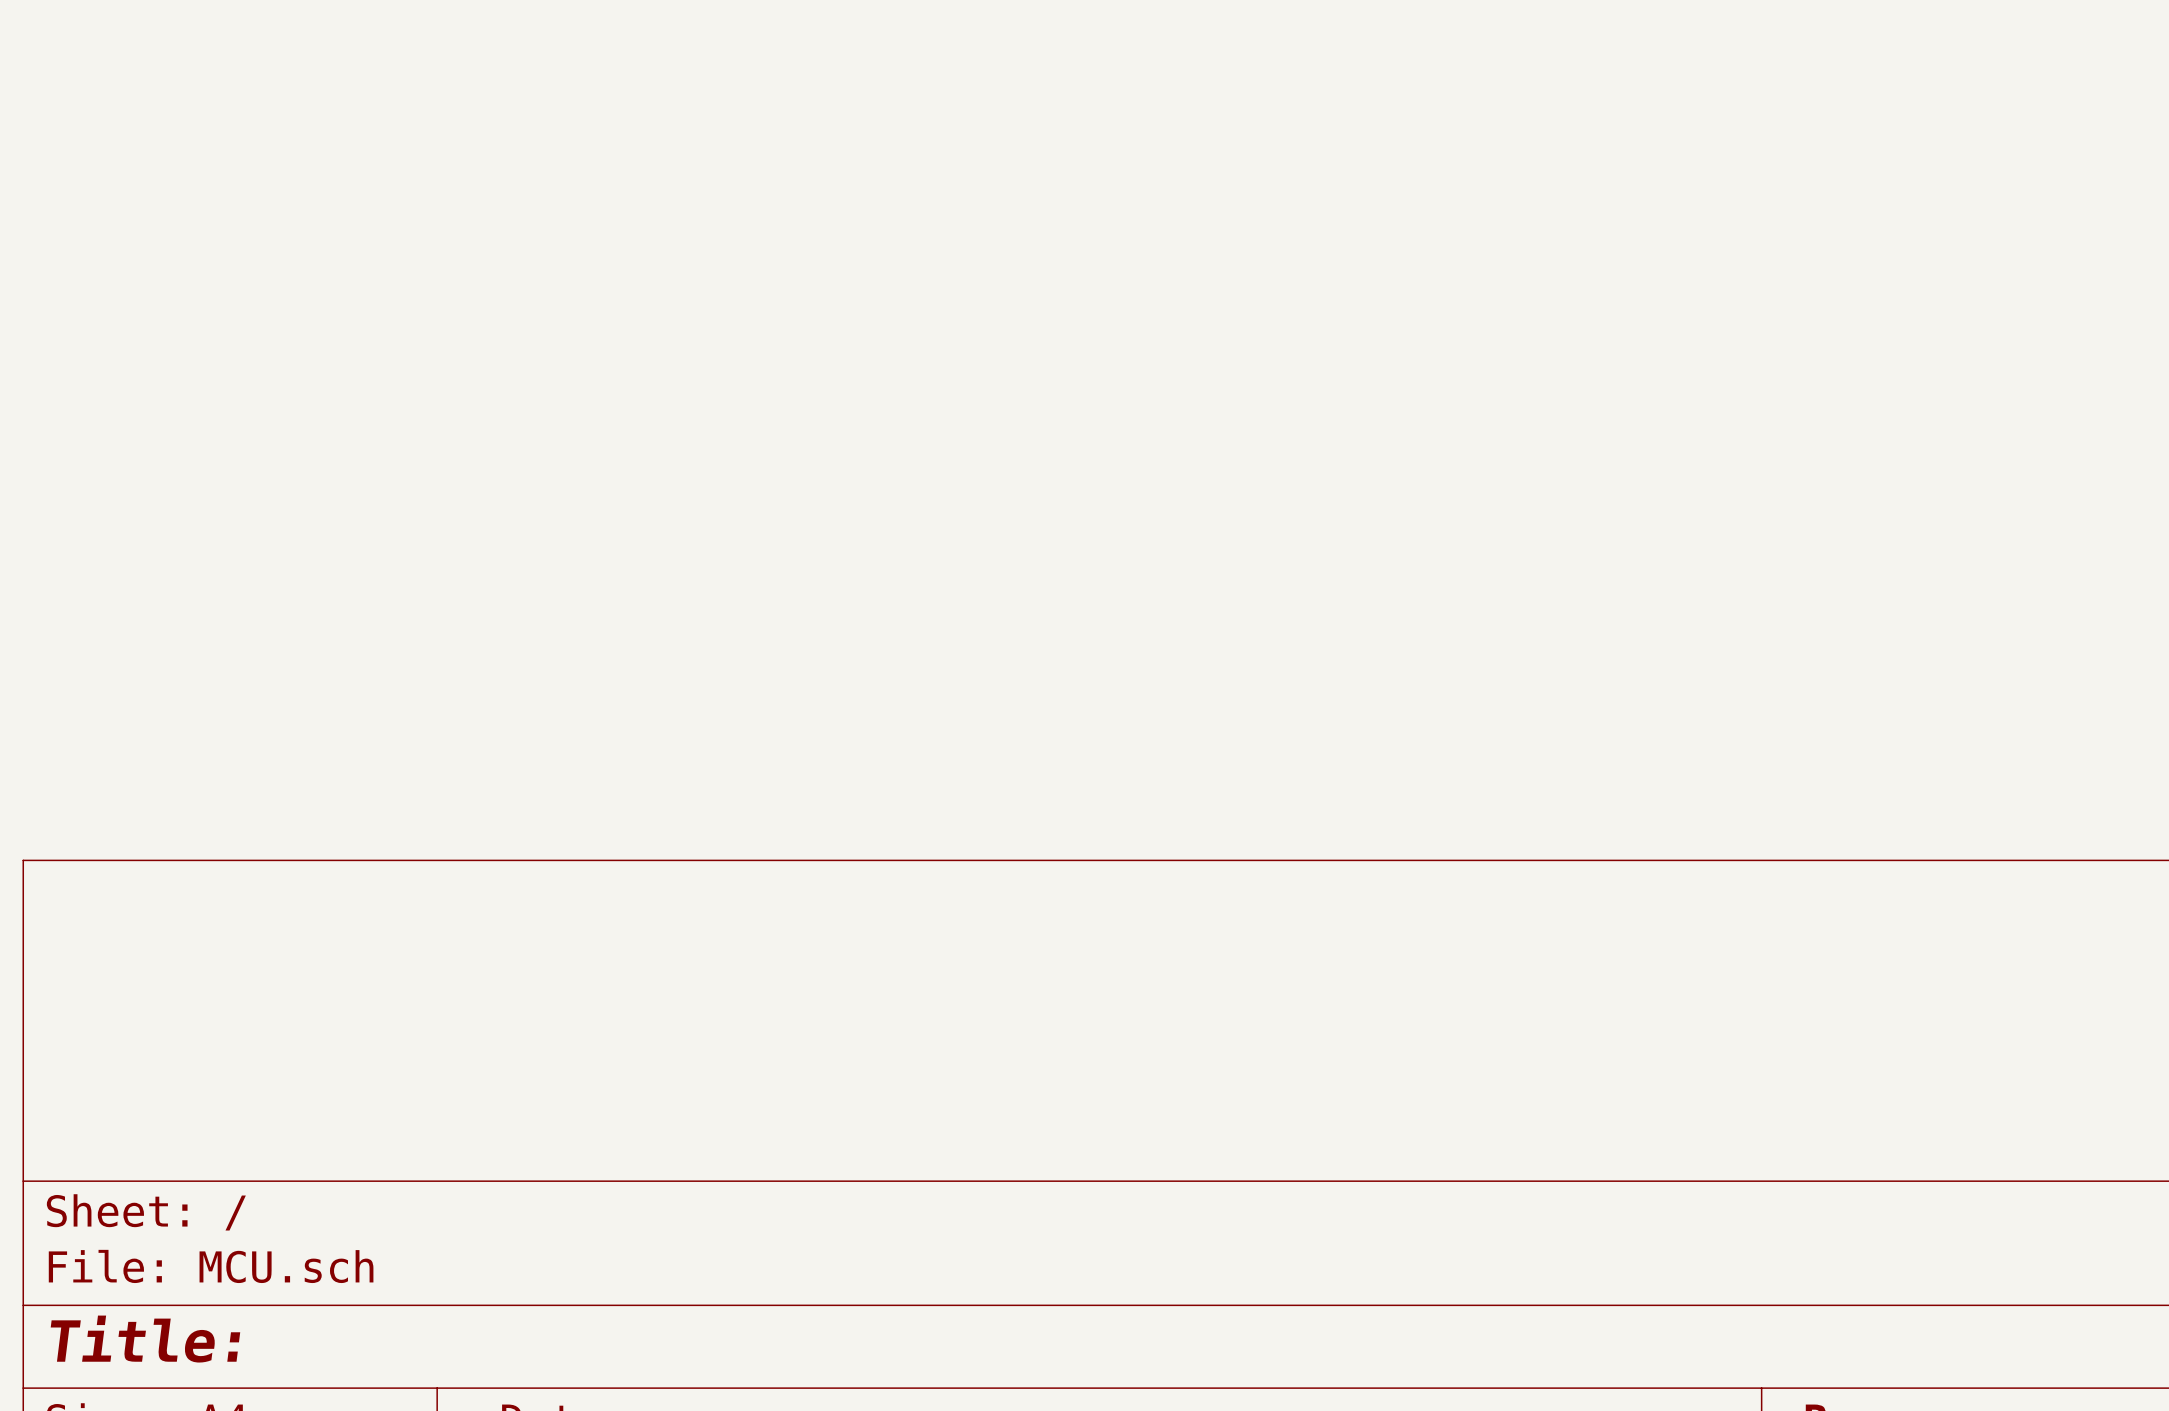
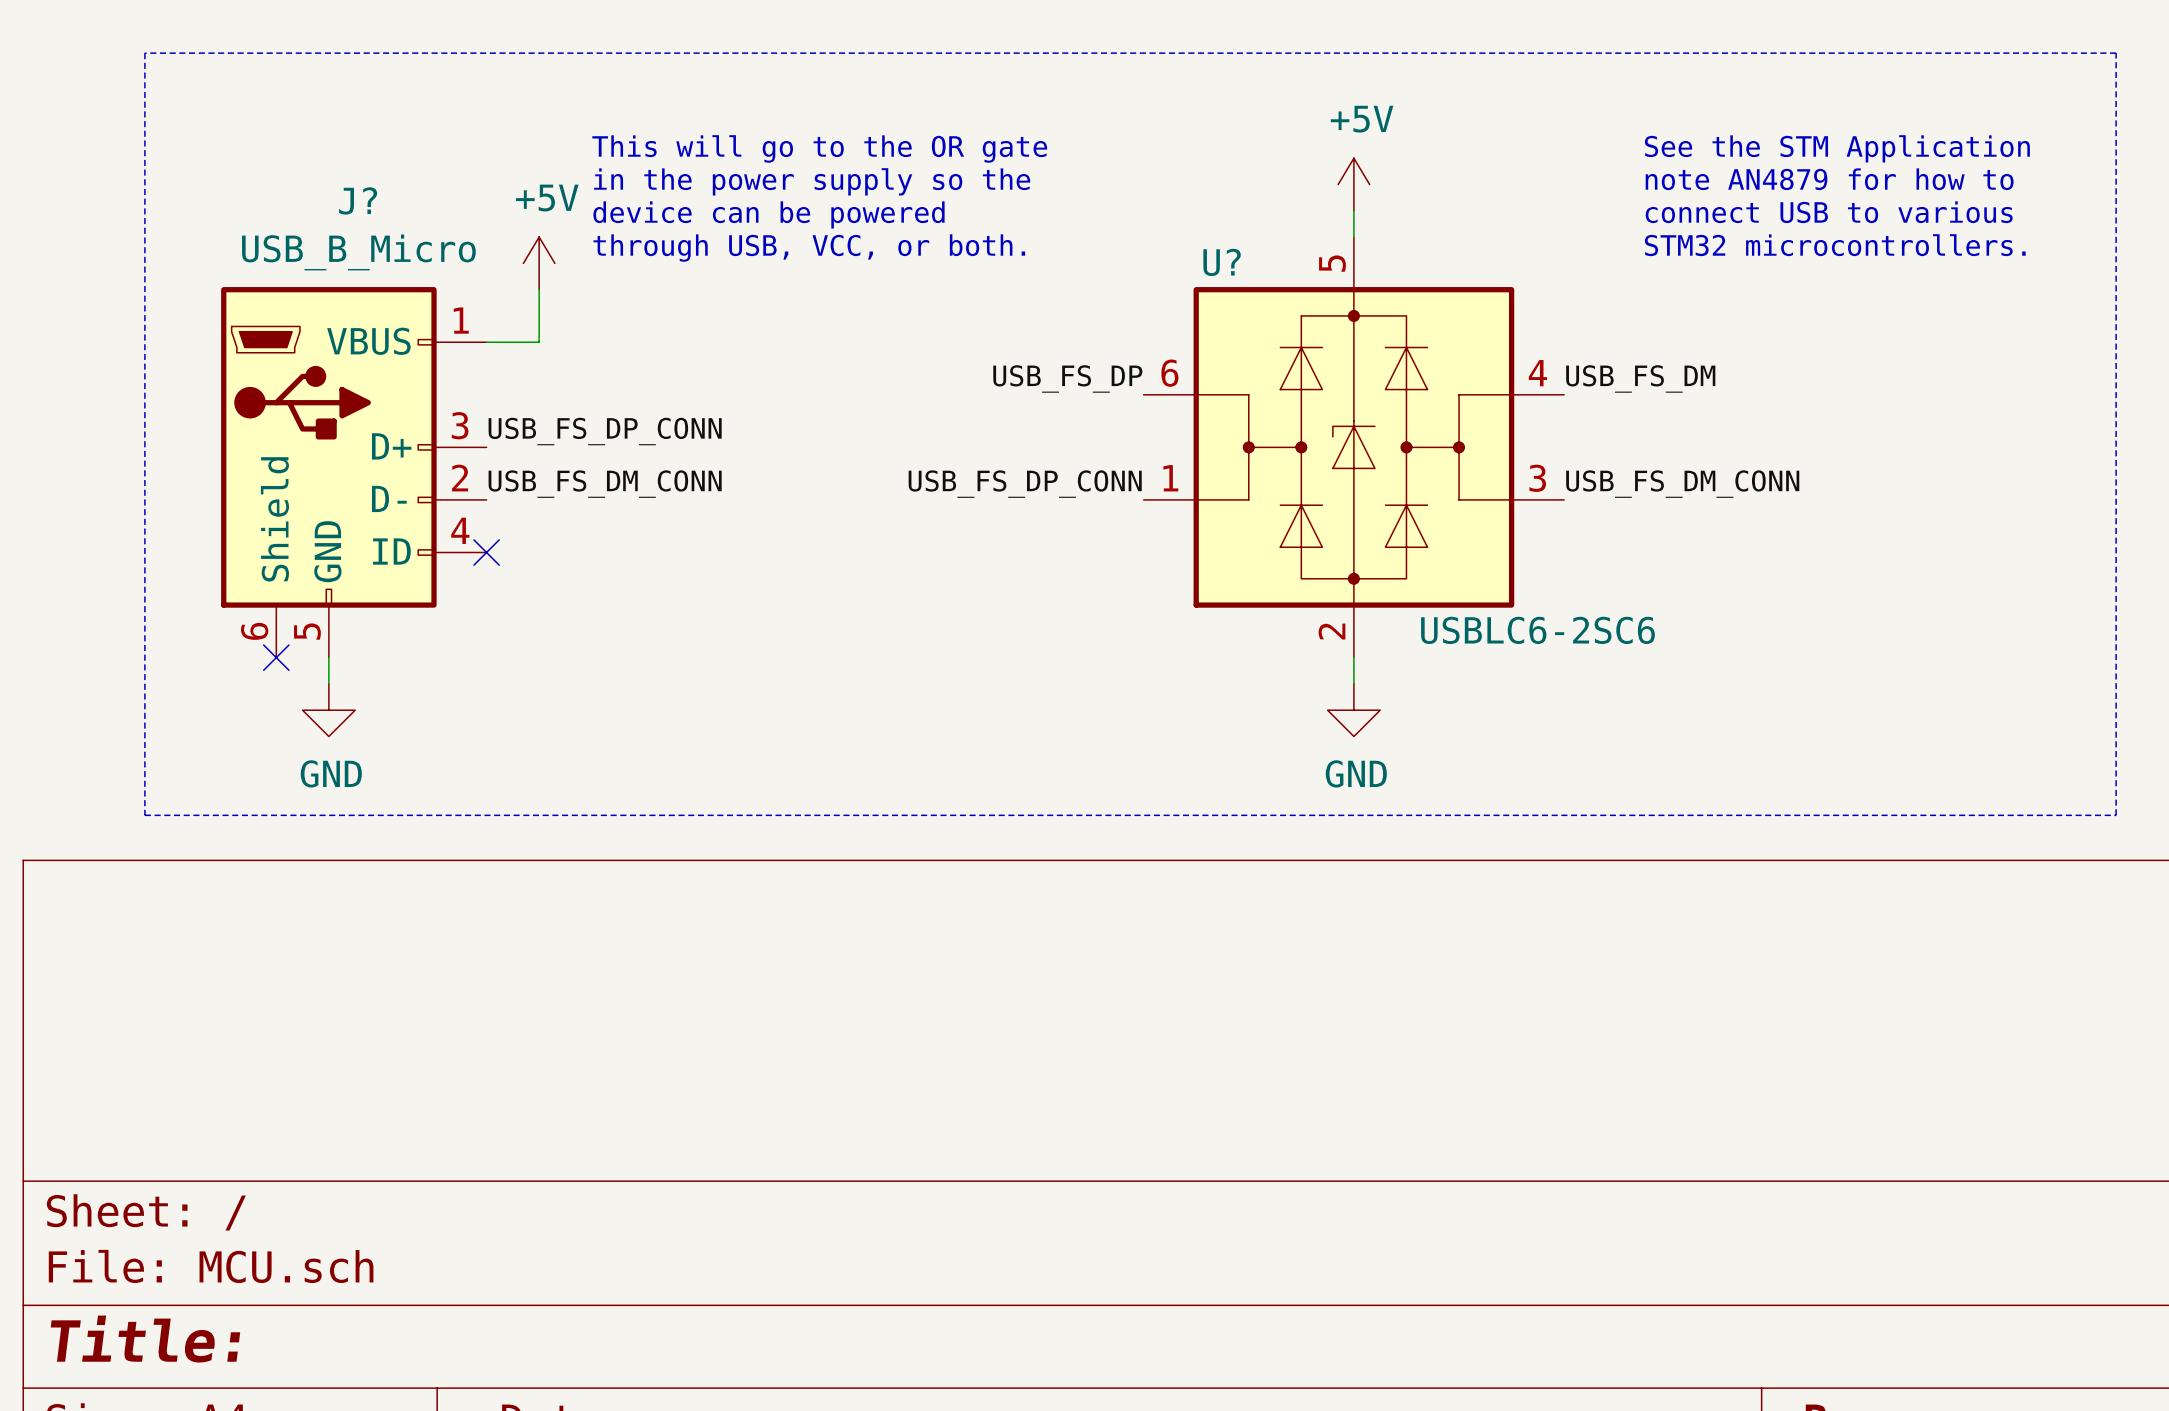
line: none -> (144, 53) (2116, 53) (2116, 815) (144, 815) (144, 53)
text: none -> This will go to the OR gate (819, 148)
text: none -> See the STM Application (1837, 148)
text: none -> note AN4879 for how to (1829, 179)
text: none -> in the power supply so the (812, 181)
power symbol: none -> +5V (1353, 184)
wire: none -> (1353, 210) (1353, 237)
text: none -> connect USB to various (1829, 212)
text: none -> device can be powered (768, 214)
text: none -> STM32 microcontrollers. (1835, 245)
text: none -> through USB, VCC, or both. (809, 248)
power symbol: none -> +5V (539, 263)
wire: none -> (539, 289) (539, 342) (486, 342)
label: none -> USB_FS_DP (1067, 378)
label: none -> USB_FS_DM (1640, 378)
label: none -> USB_FS_DP_CONN (605, 431)
U?: none -> USBLC6-2SC6 (1353, 447)
J?: none -> USB_B_Micro (353, 472)
label: none -> USB_FS_DM_CONN (605, 484)
label: none -> USB_FS_DP_CONN (1025, 484)
label: none -> USB_FS_DM_CONN (1682, 484)
no-connect mark: none -> (486, 552)
no-connect mark: none -> (276, 657)
wire: none -> (328, 657) (328, 683)
wire: none -> (1353, 657) (1353, 683)
power symbol: none -> GND (328, 710)
power symbol: none -> GND (1353, 710)

